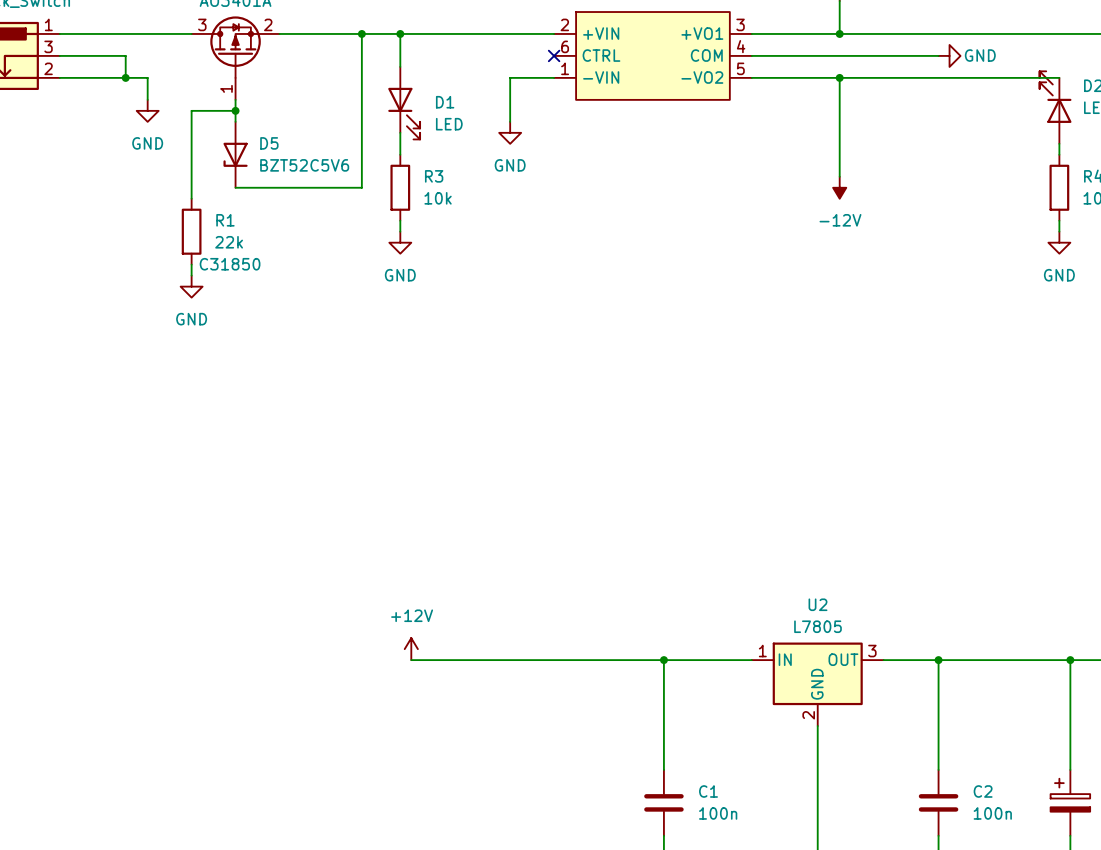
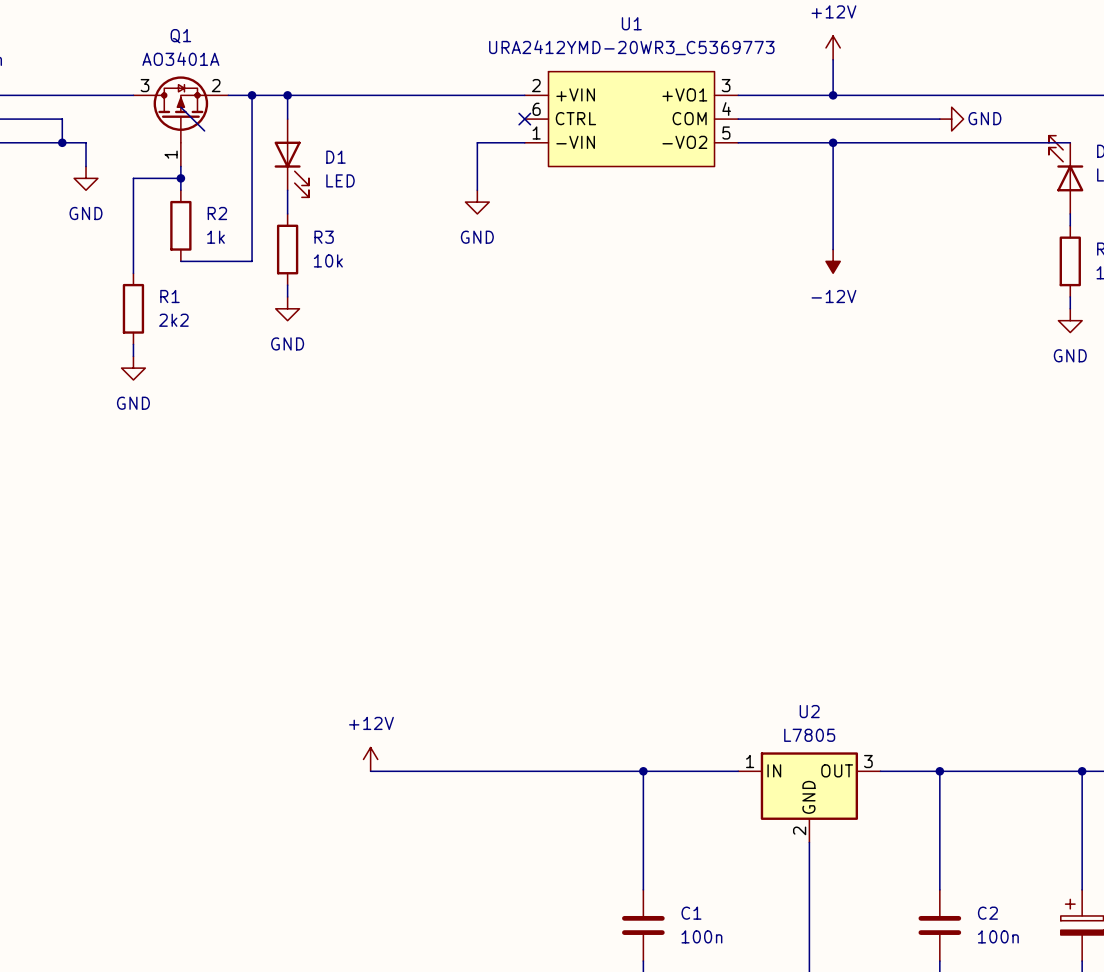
junction: none -> (252, 95)
wire: none -> (287, 95) (287, 119)
wire: (361, 33) (361, 187) (301, 187) -> (252, 95) (252, 261)
junction position: (361, 33) -> (287, 95)
wire: (400, 33) (400, 66) -> none
junction: (400, 33) -> none
wire: none -> (180, 107) (204, 130)
D1 position: (404, 103) -> (291, 158)
wire: (400, 132) (400, 154) -> (287, 190) (287, 213)
D5: BZT52C5V6 (235, 154) -> none
R2: none -> 1k (180, 225)
R3 position: (400, 187) -> (287, 249)
wire: (400, 220) (400, 231) -> (287, 285) (287, 296)
R1 value: 22k (229, 242) -> 2k2 (173, 320)
power symbol position: GND (400, 242) -> GND (287, 308)
R1 text: C31850 (230, 264) -> none

